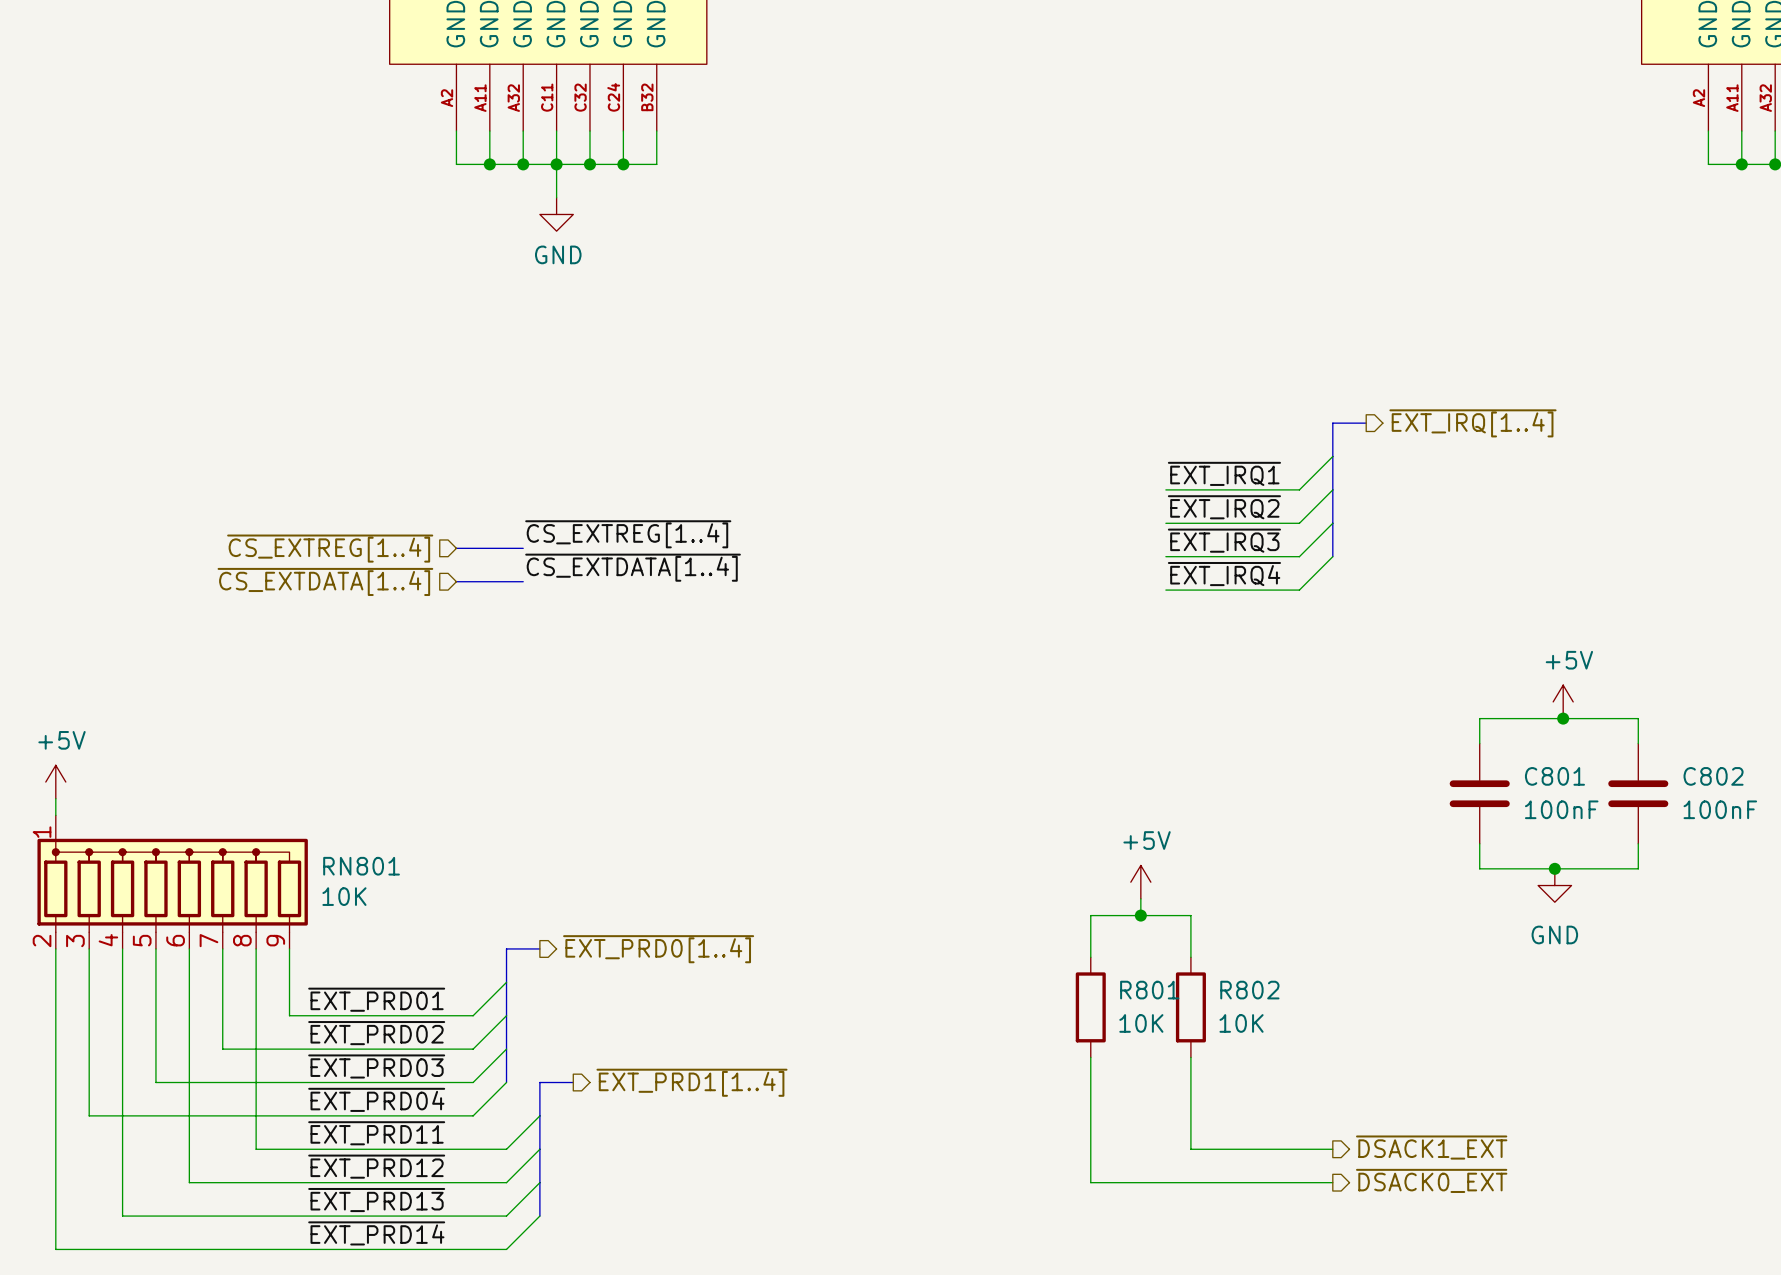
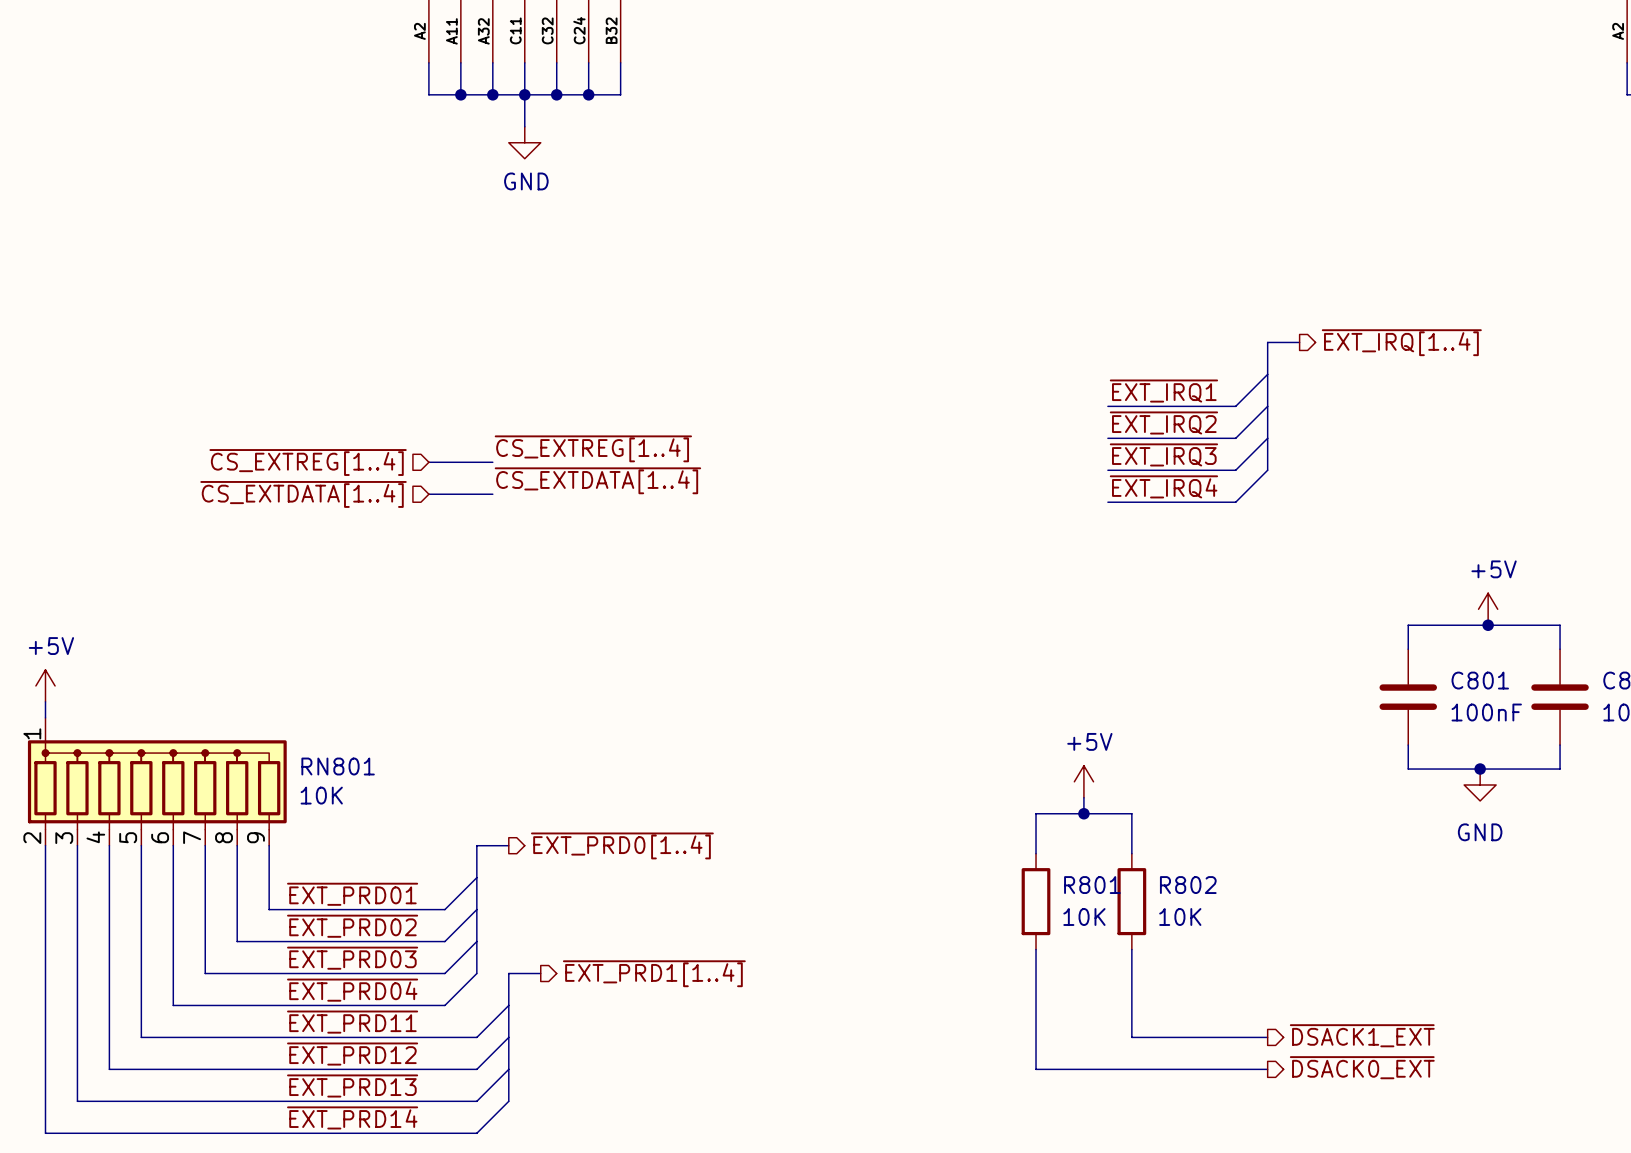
wire: (222, 1049) (256, 1049) (256, 1149) -> (205, 941) (205, 973)
wire: (155, 1082) (222, 1082) -> (141, 973) (141, 1037) (237, 1037)
wire: (89, 1115) (189, 1115) (189, 1182) -> (77, 1005) (77, 1101) (109, 1101)
wire: (122, 1182) (122, 1216) -> (109, 1069) (173, 1069)

